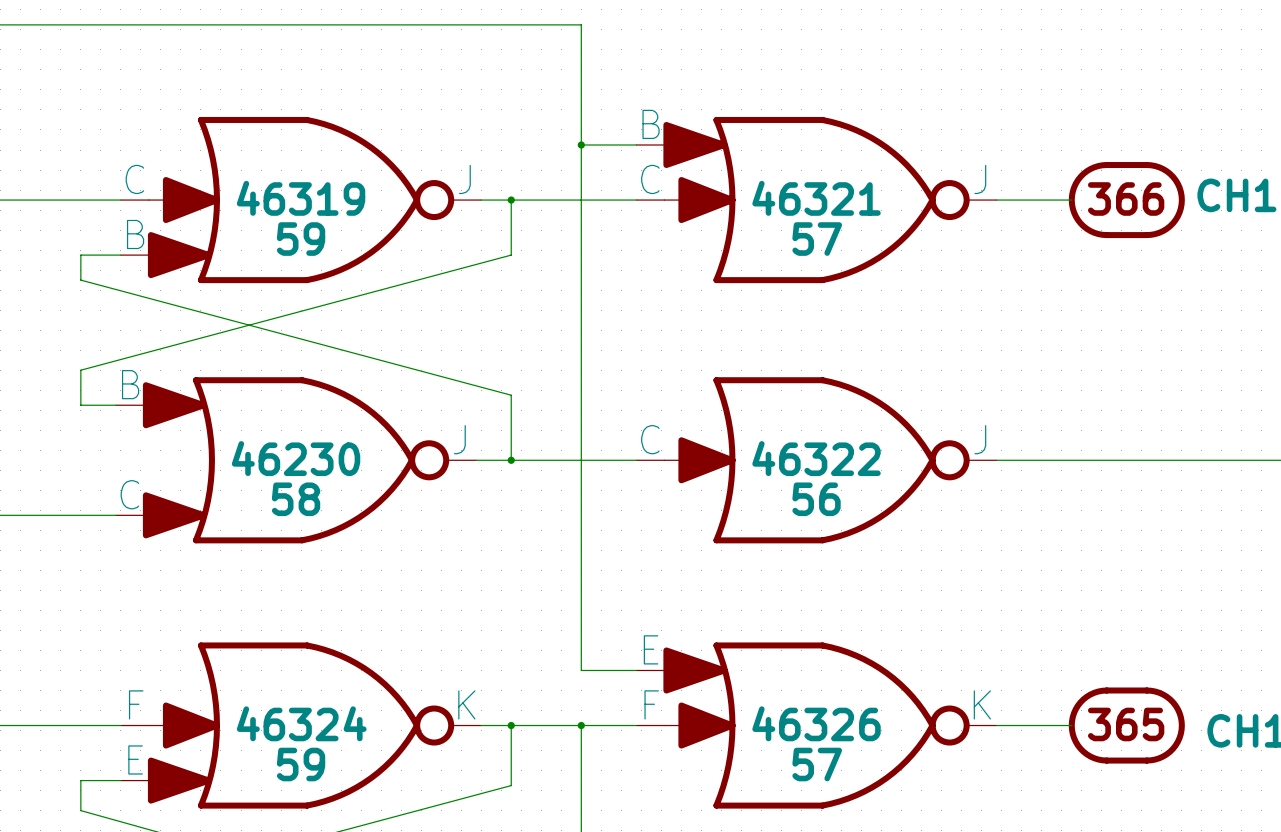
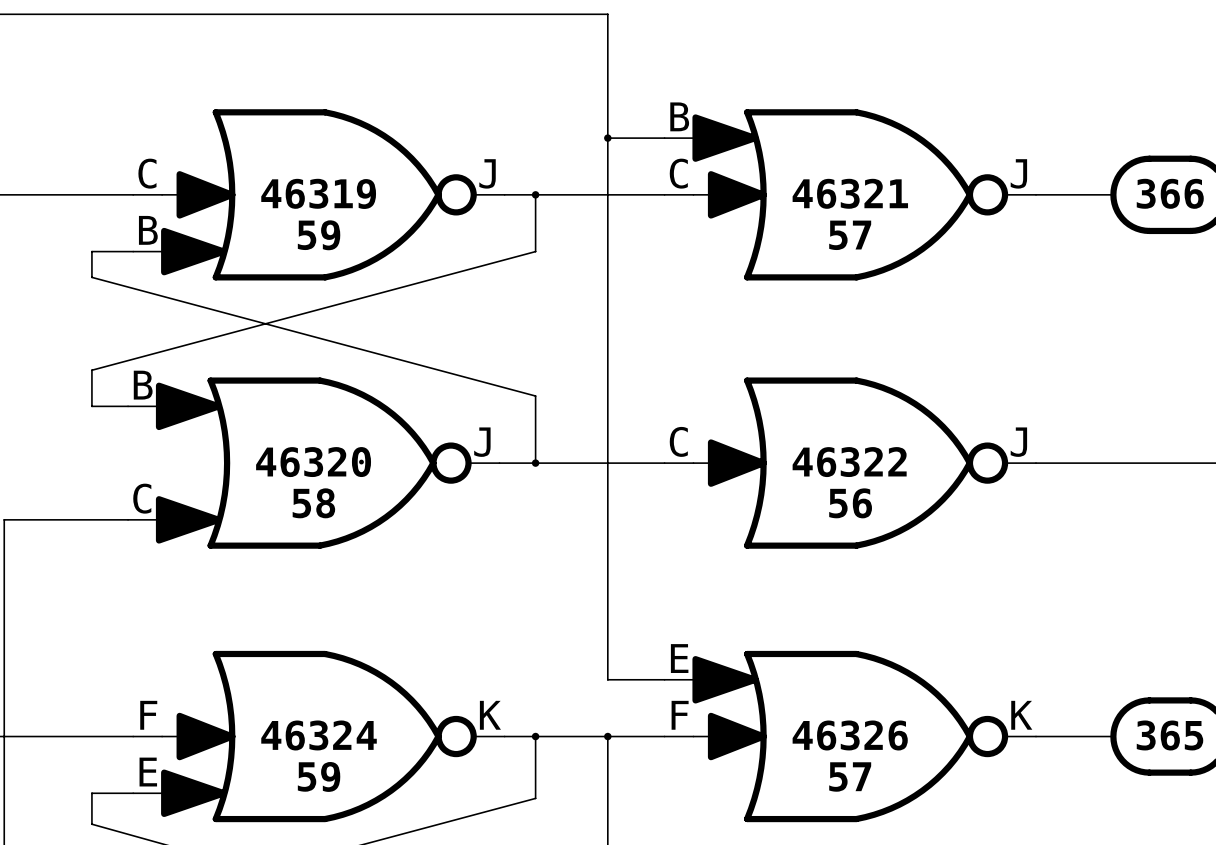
part text: 46230 (296, 458) -> 46320 (313, 462)

